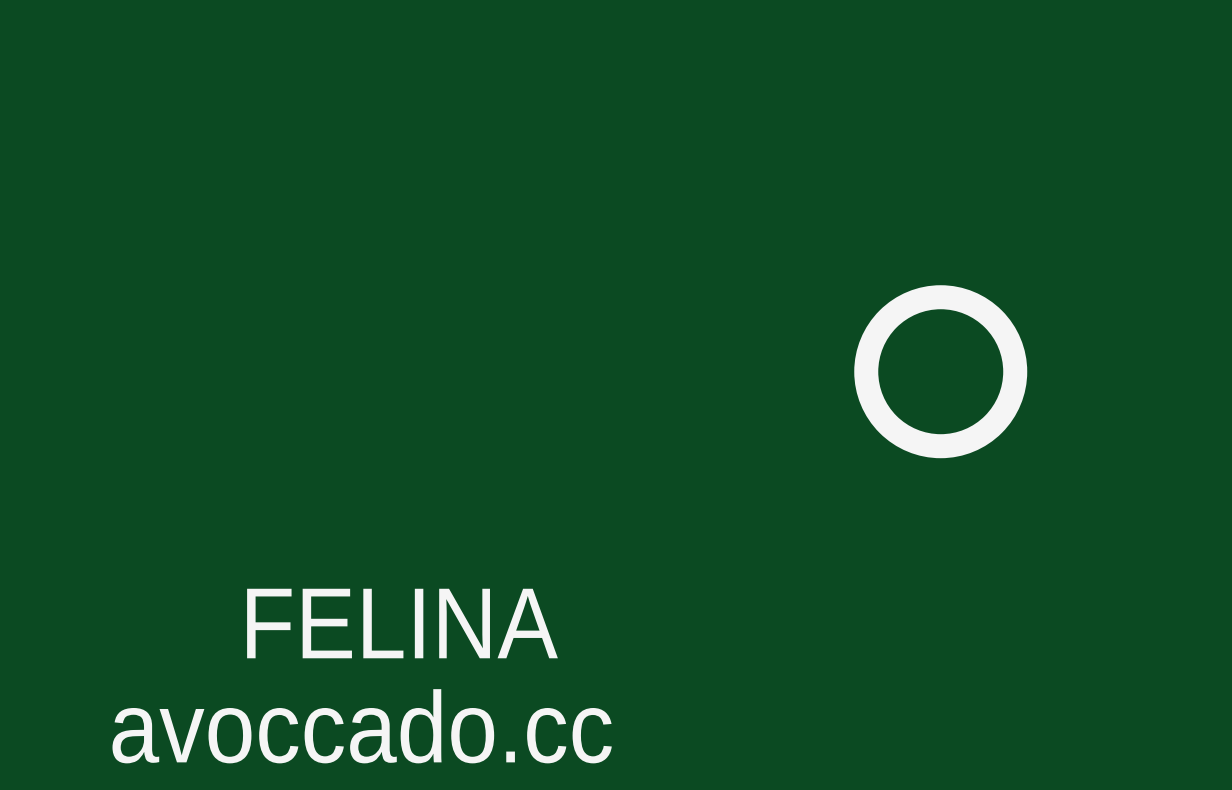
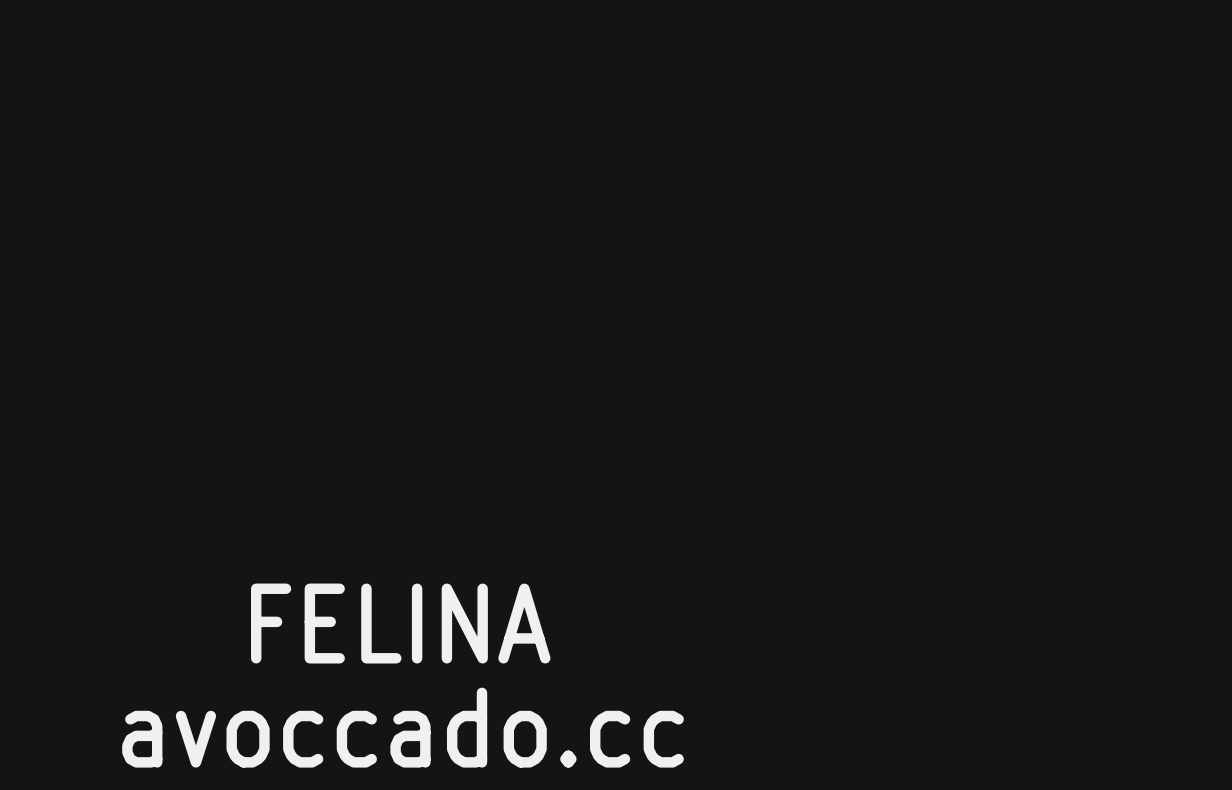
drawing: [854, 285, 1028, 459] -> none

